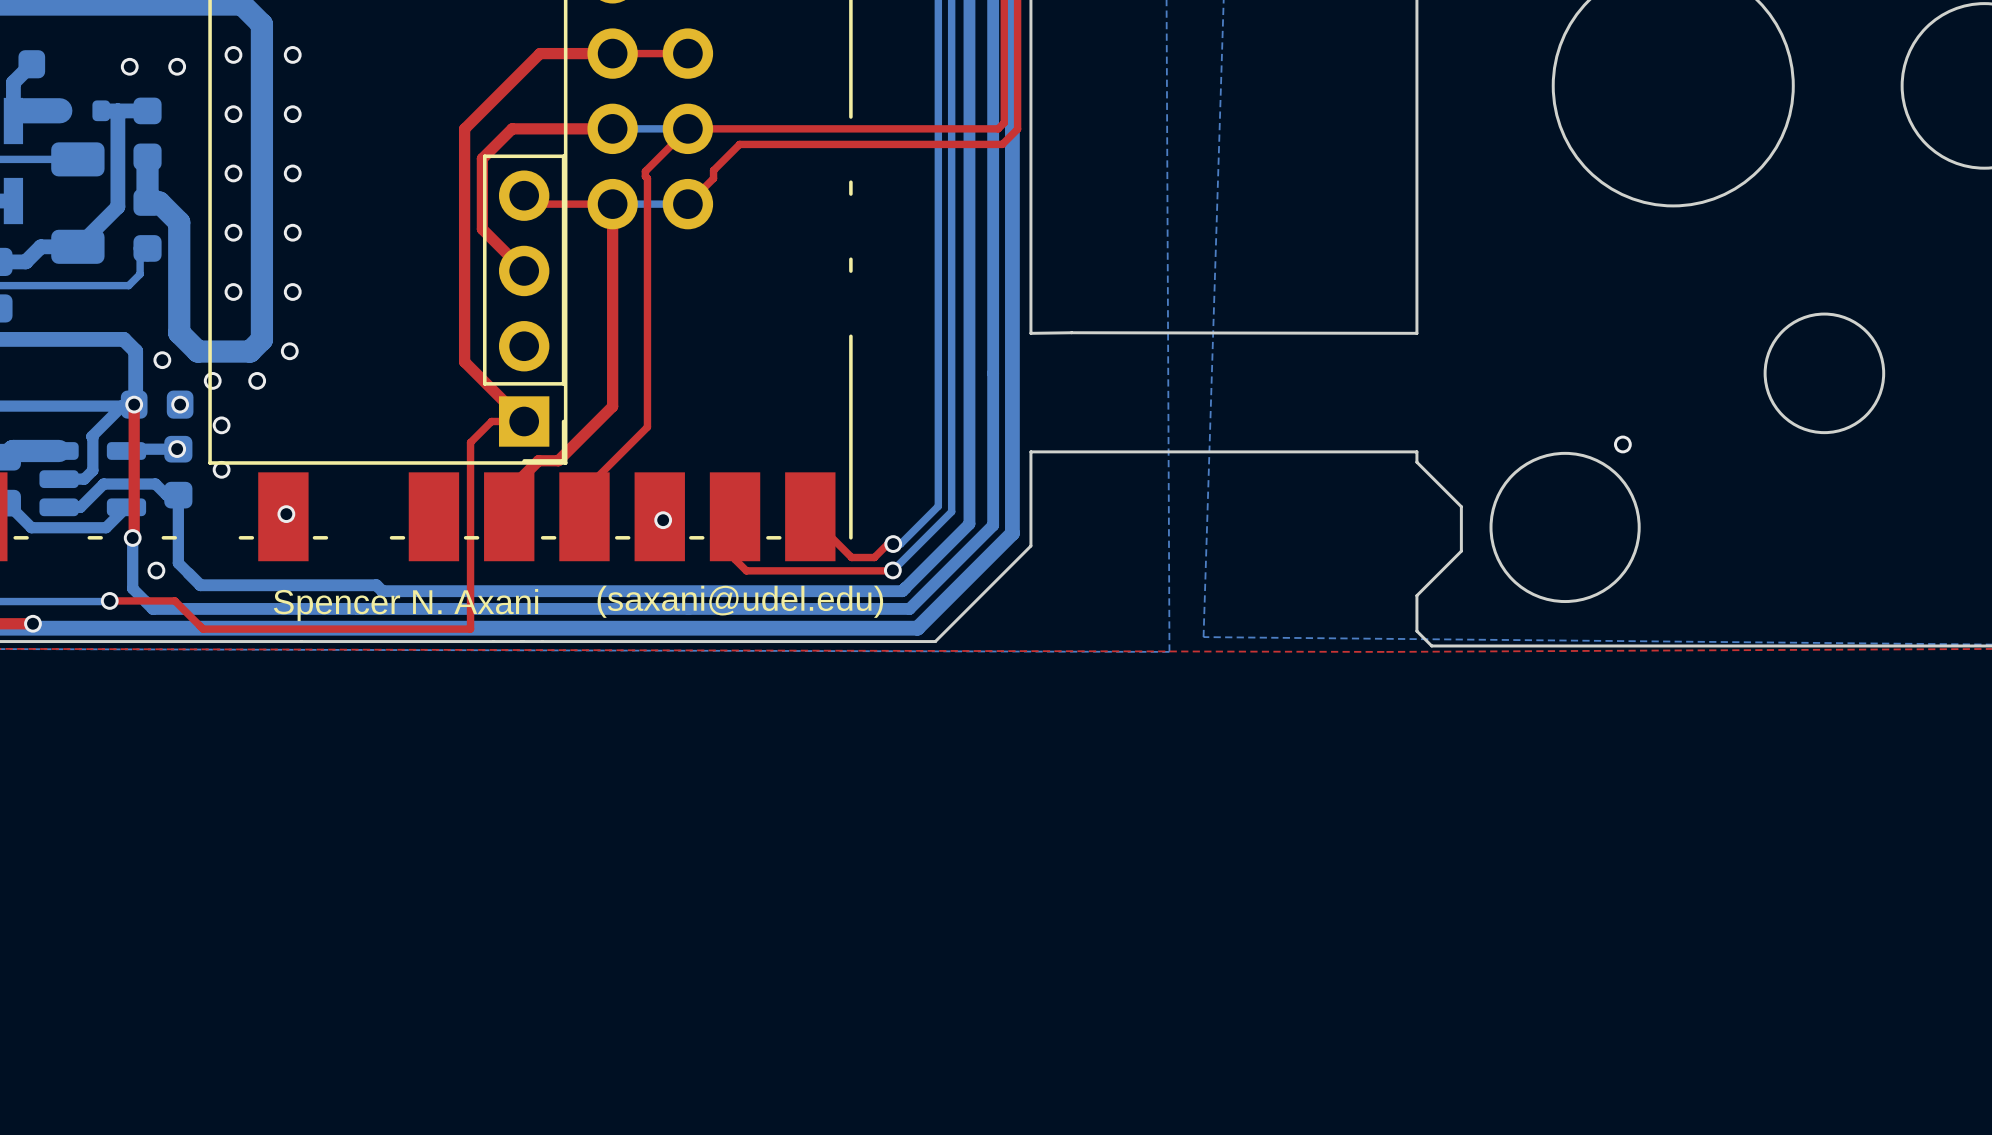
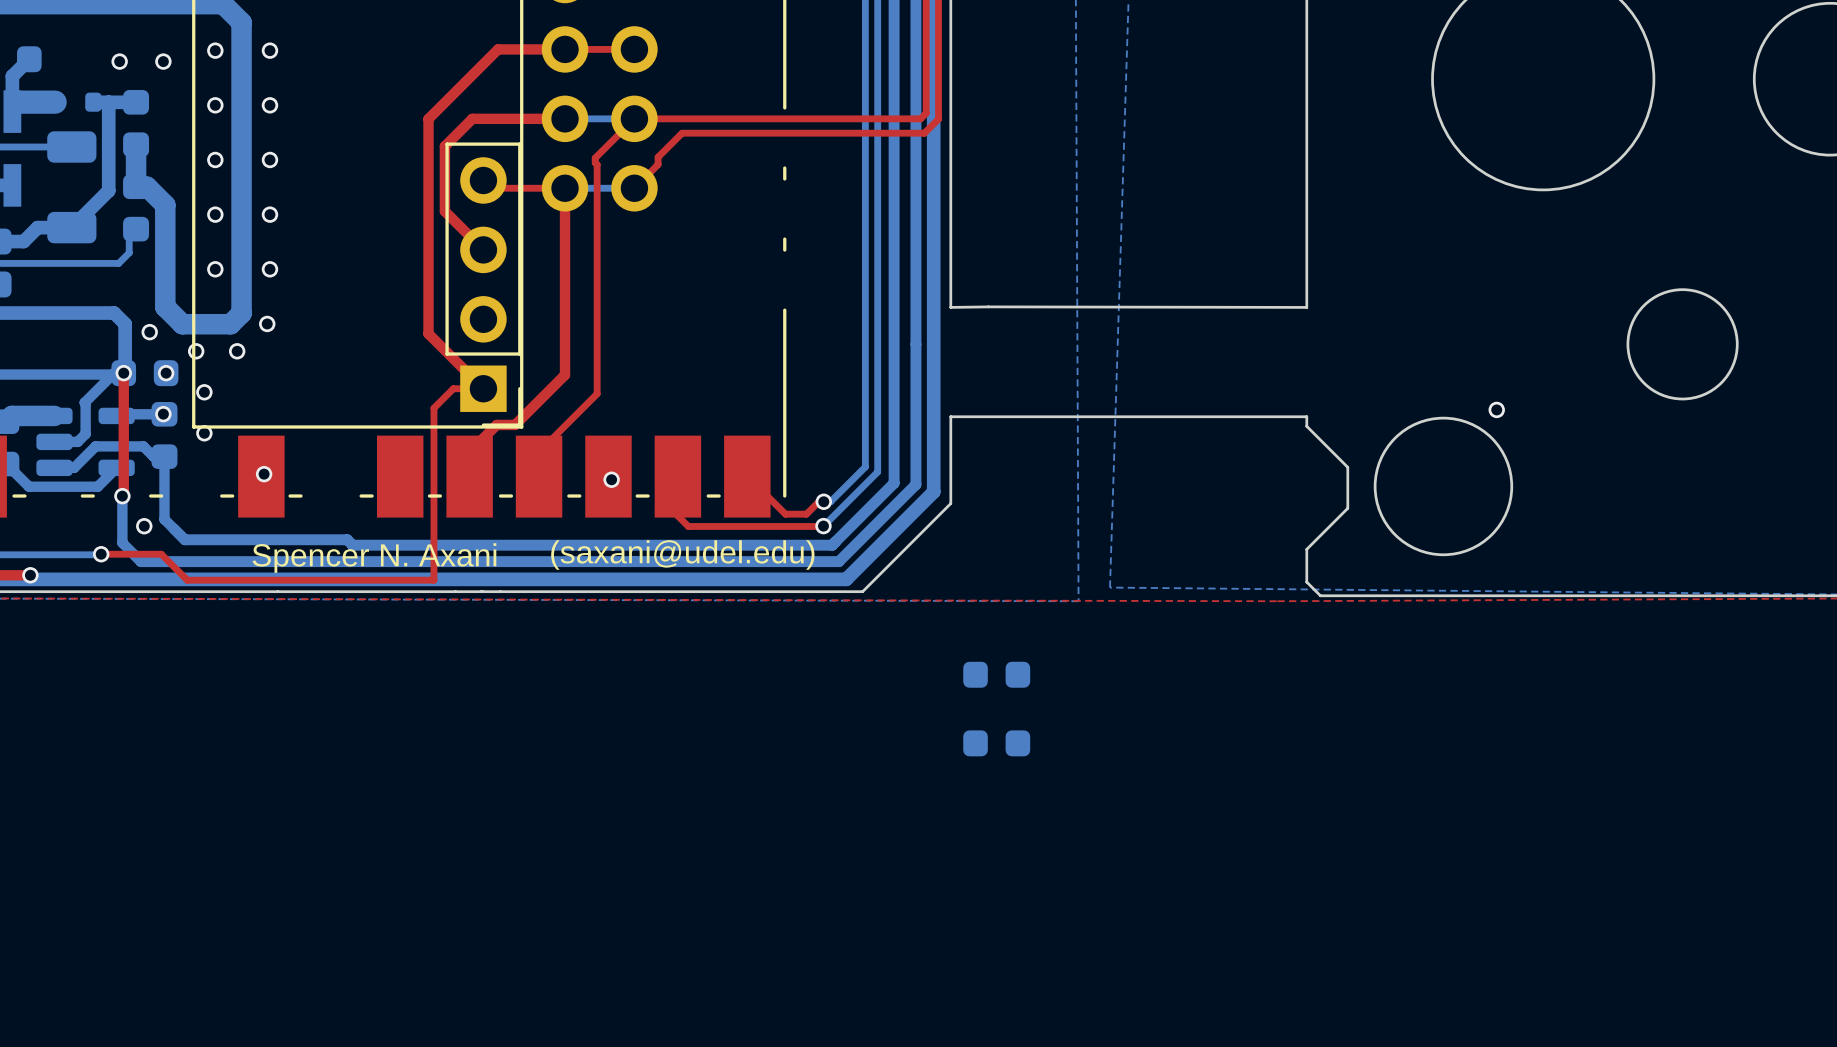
part: none -> (996, 674)
part: none -> (996, 743)

